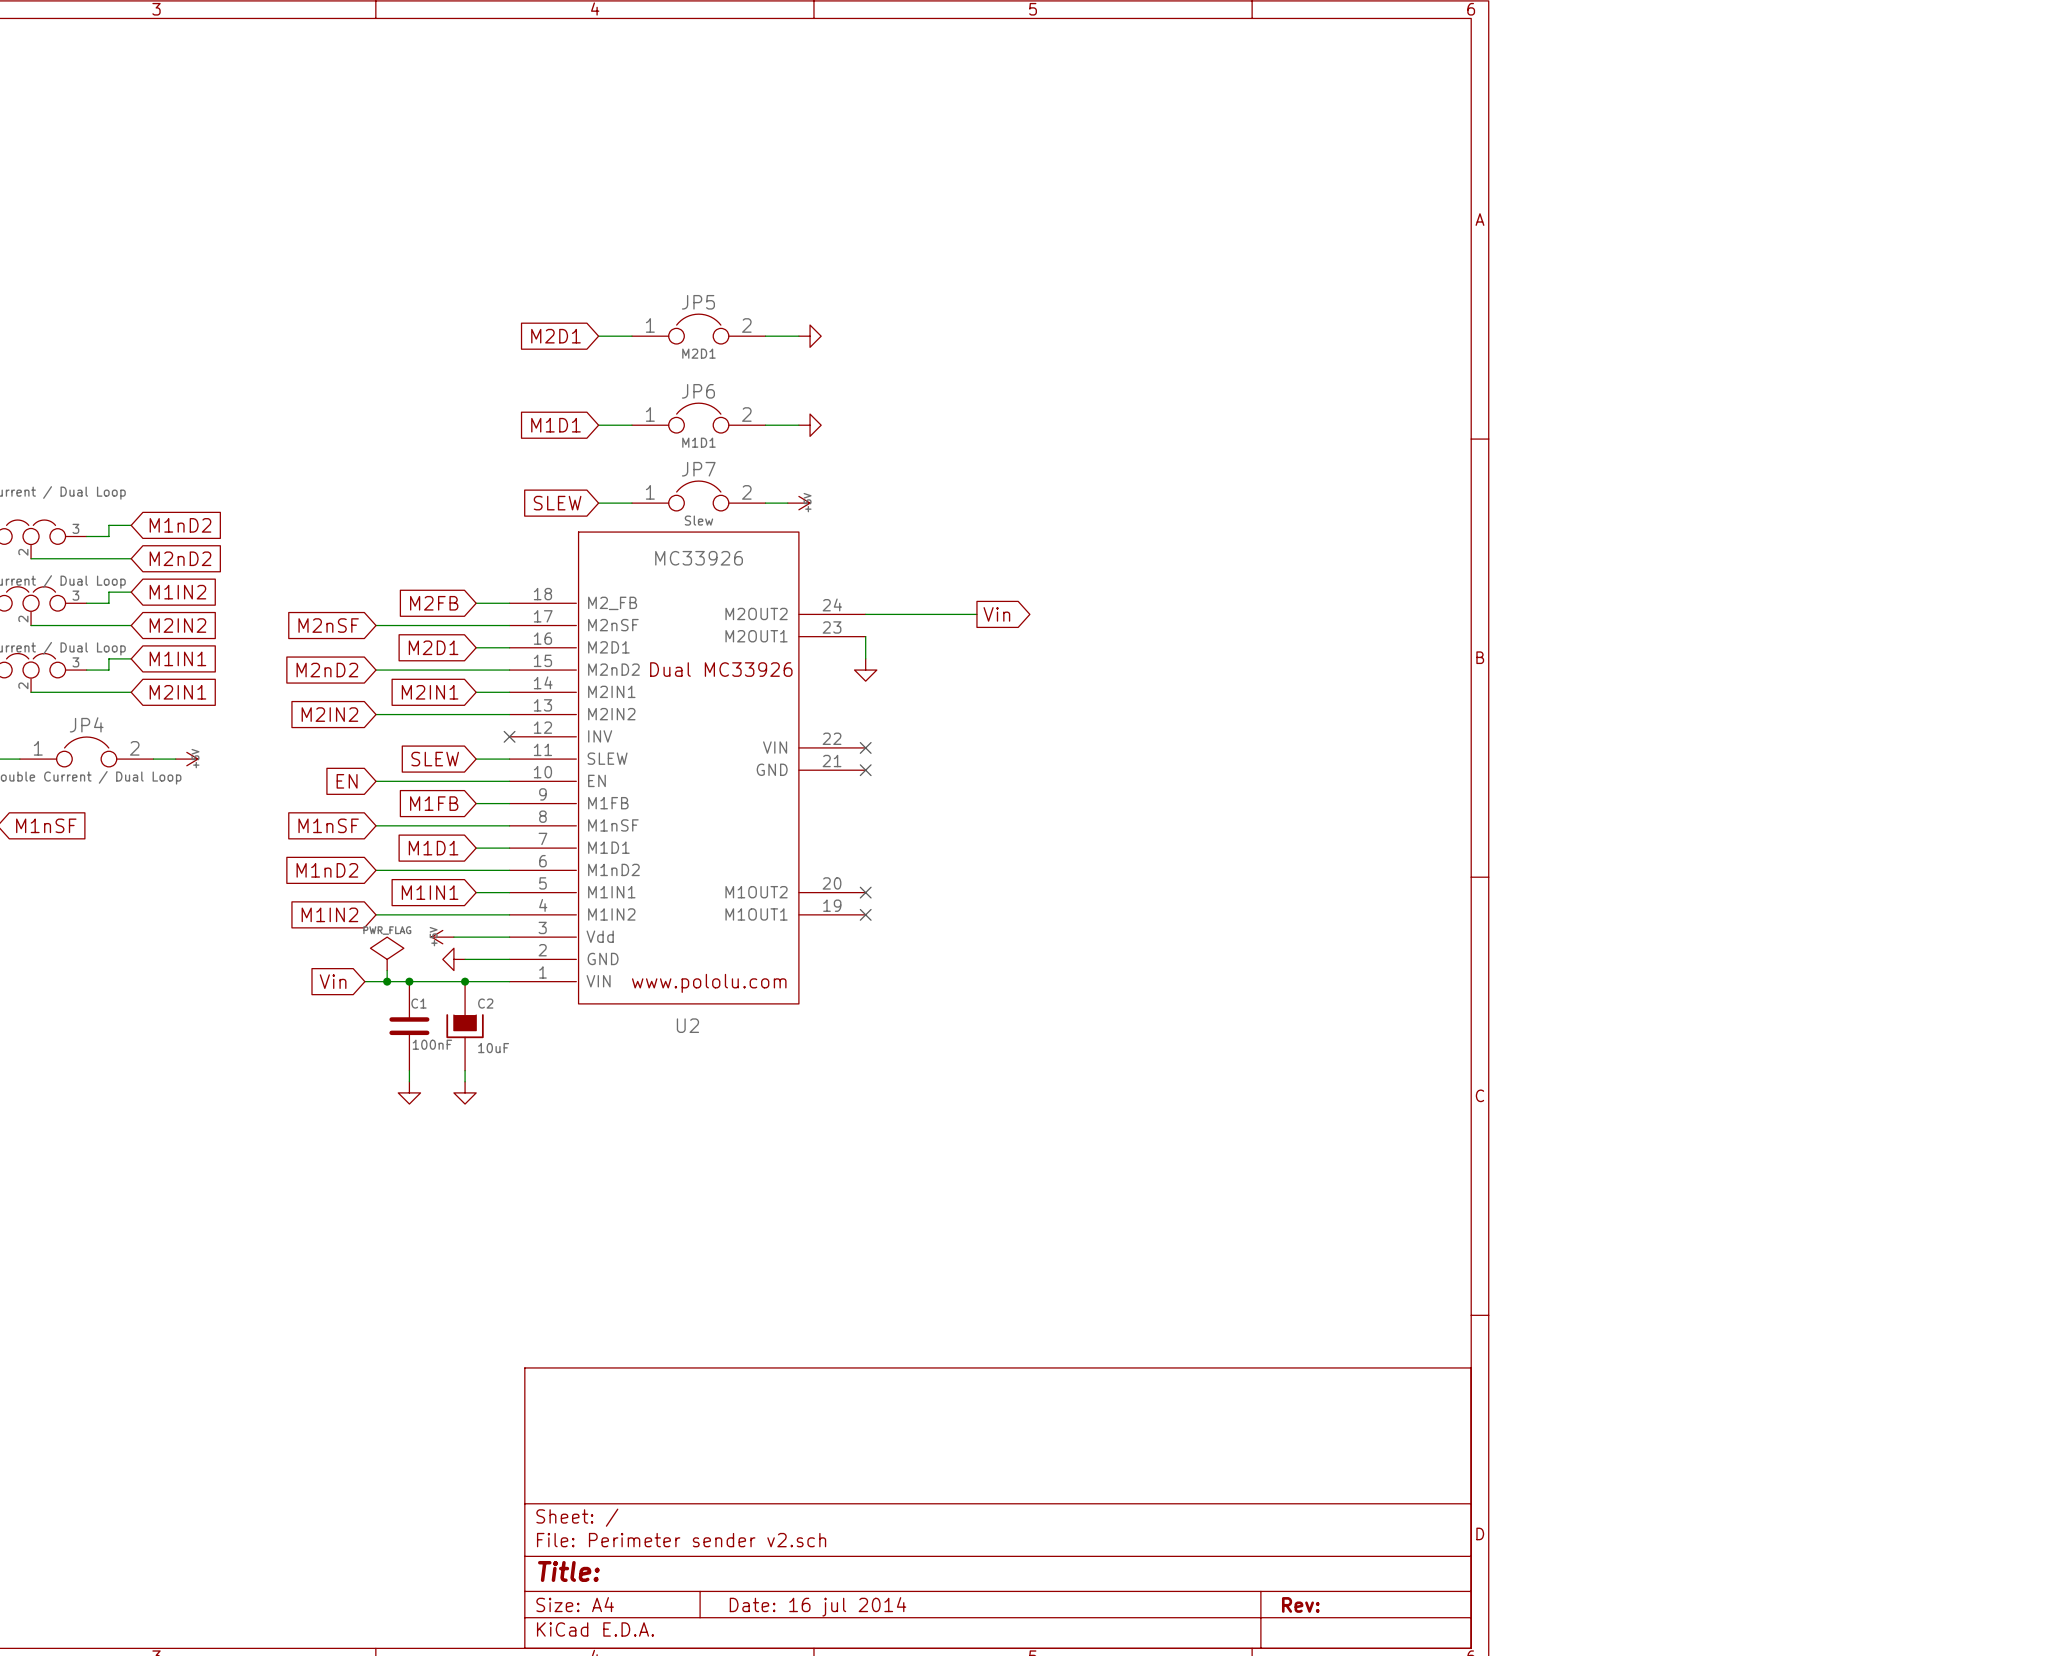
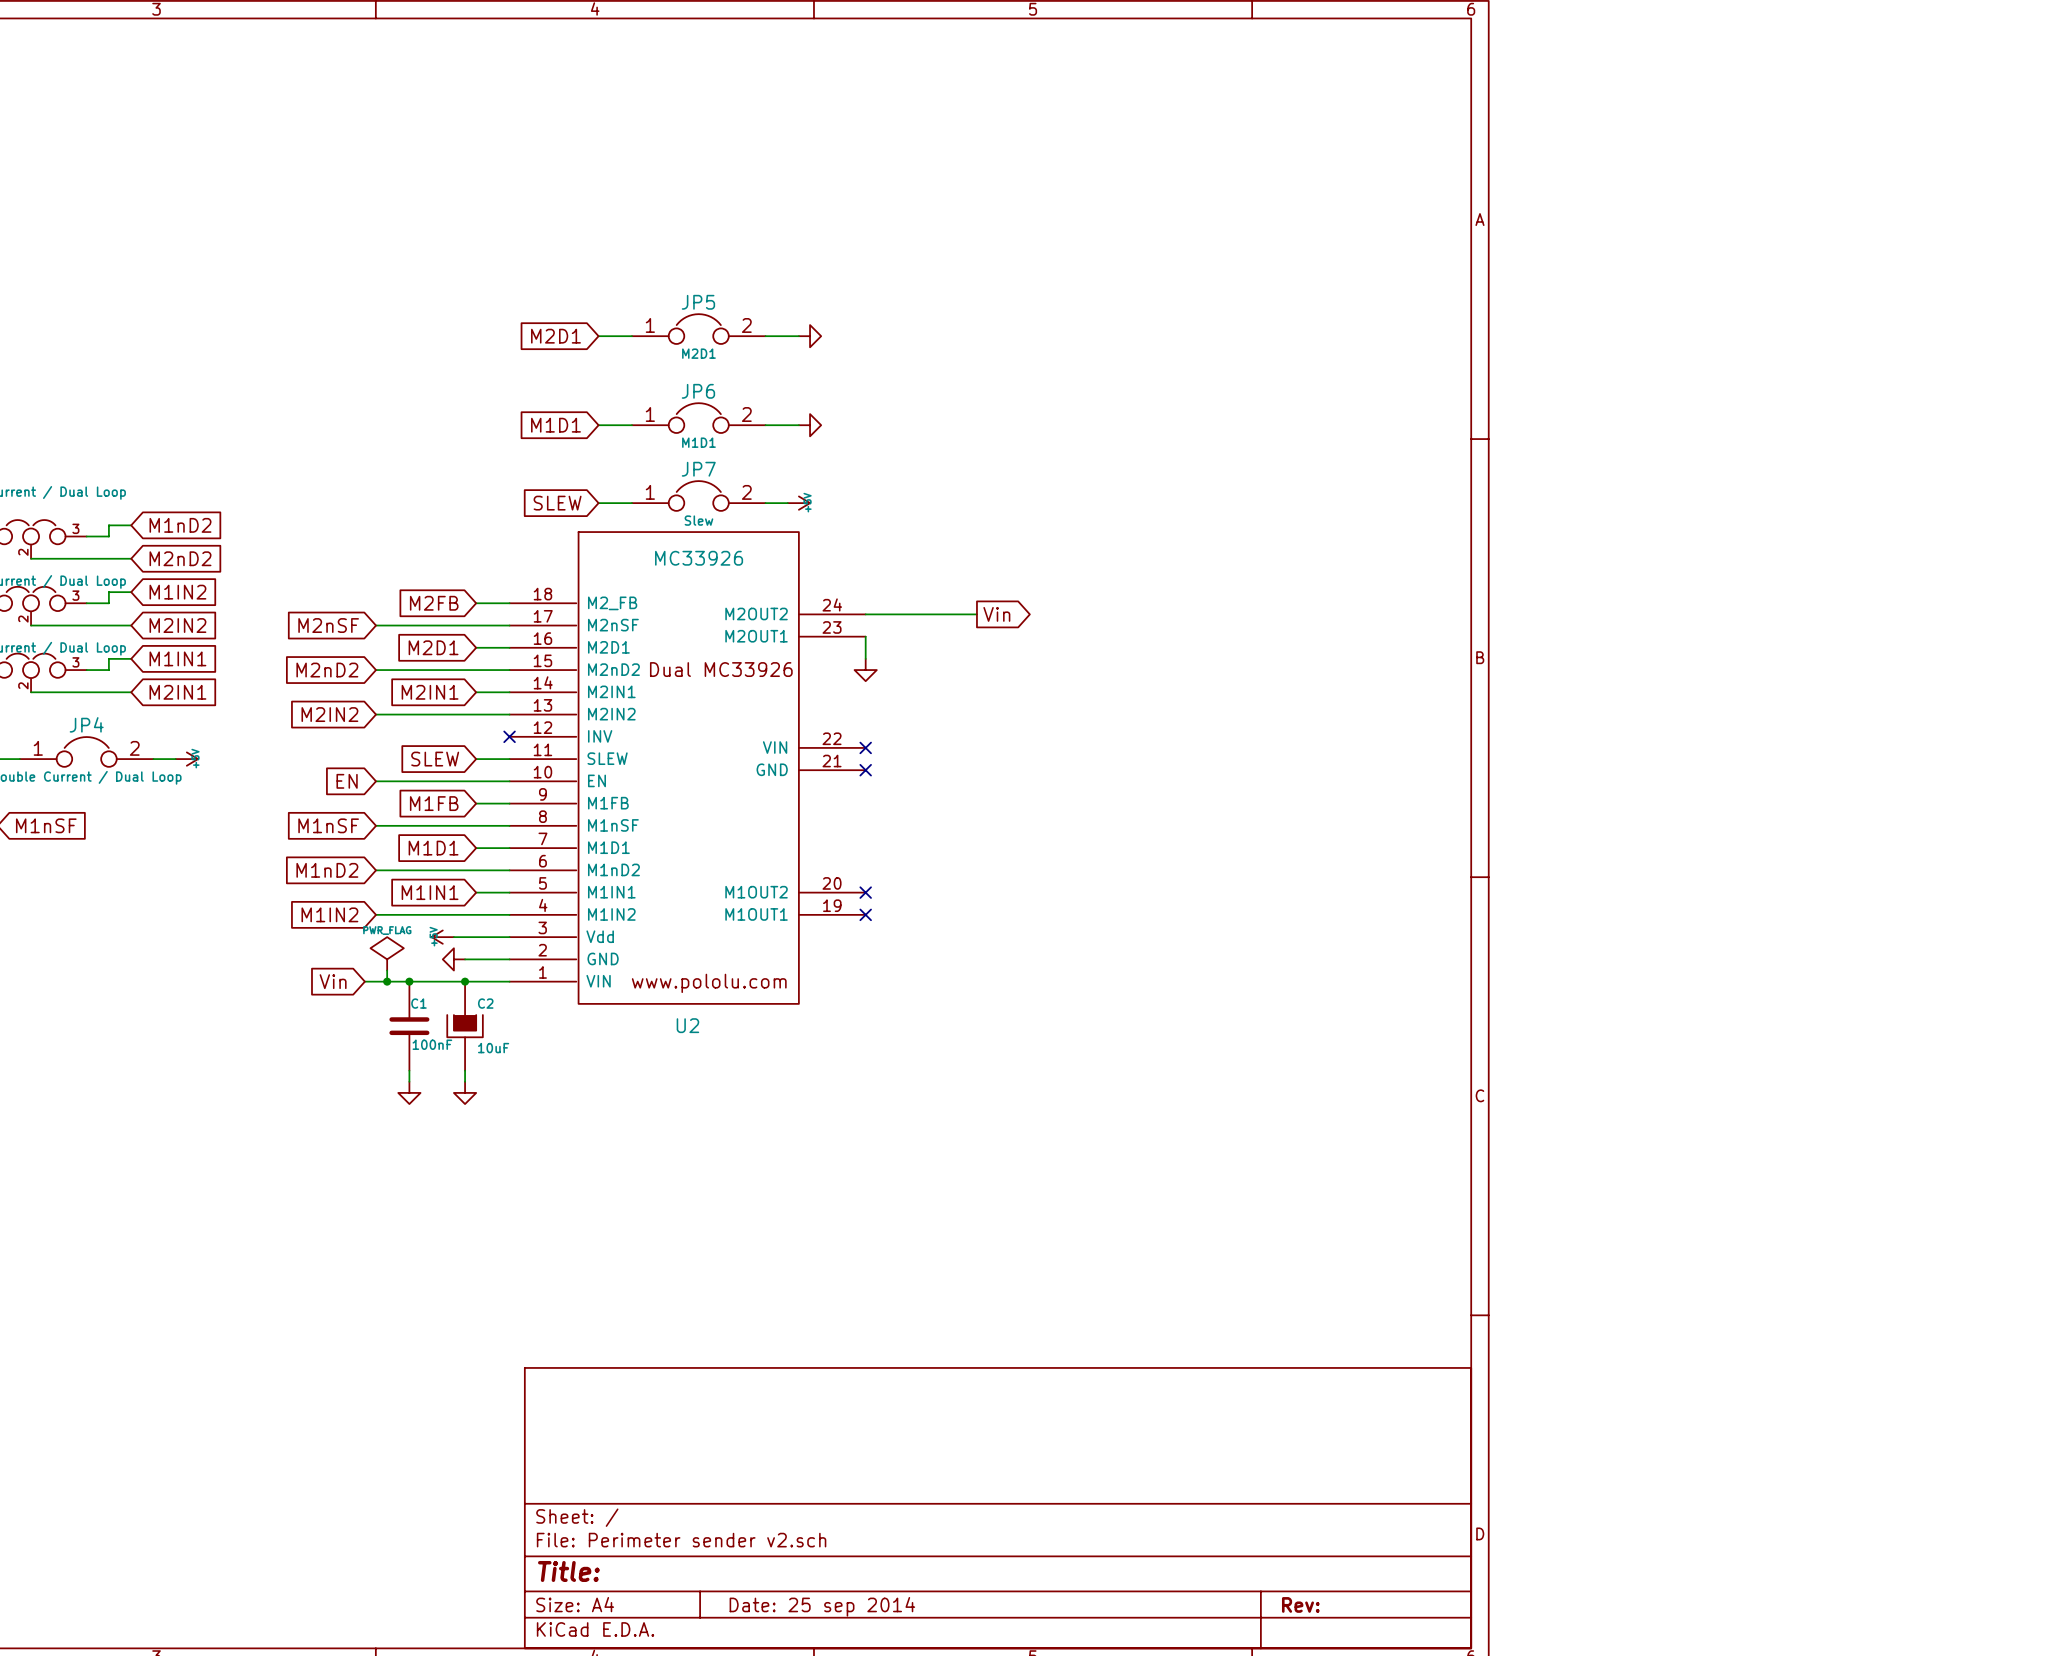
title block: Date: 16 jul 2014 (818, 1606) -> Date: 25 sep 2014 (822, 1606)

